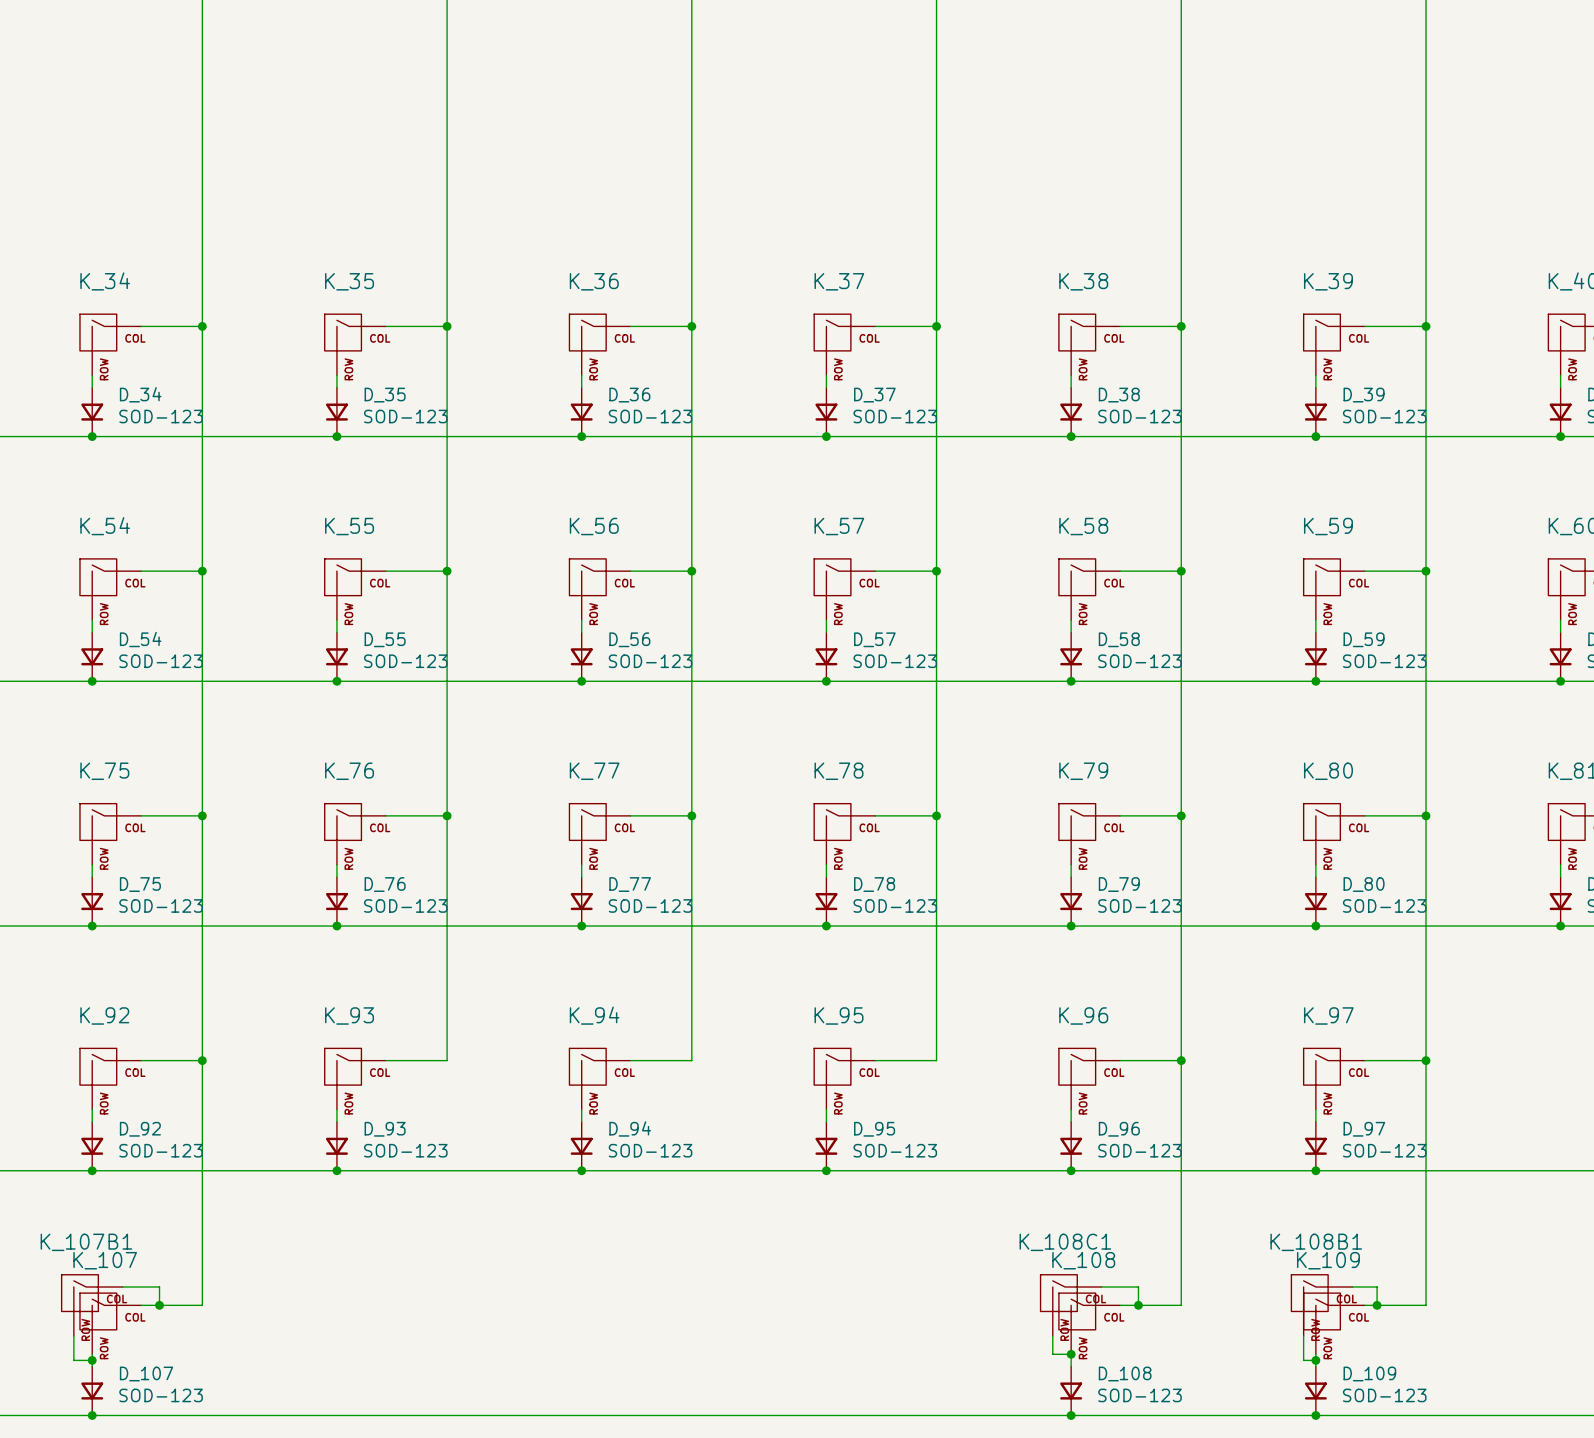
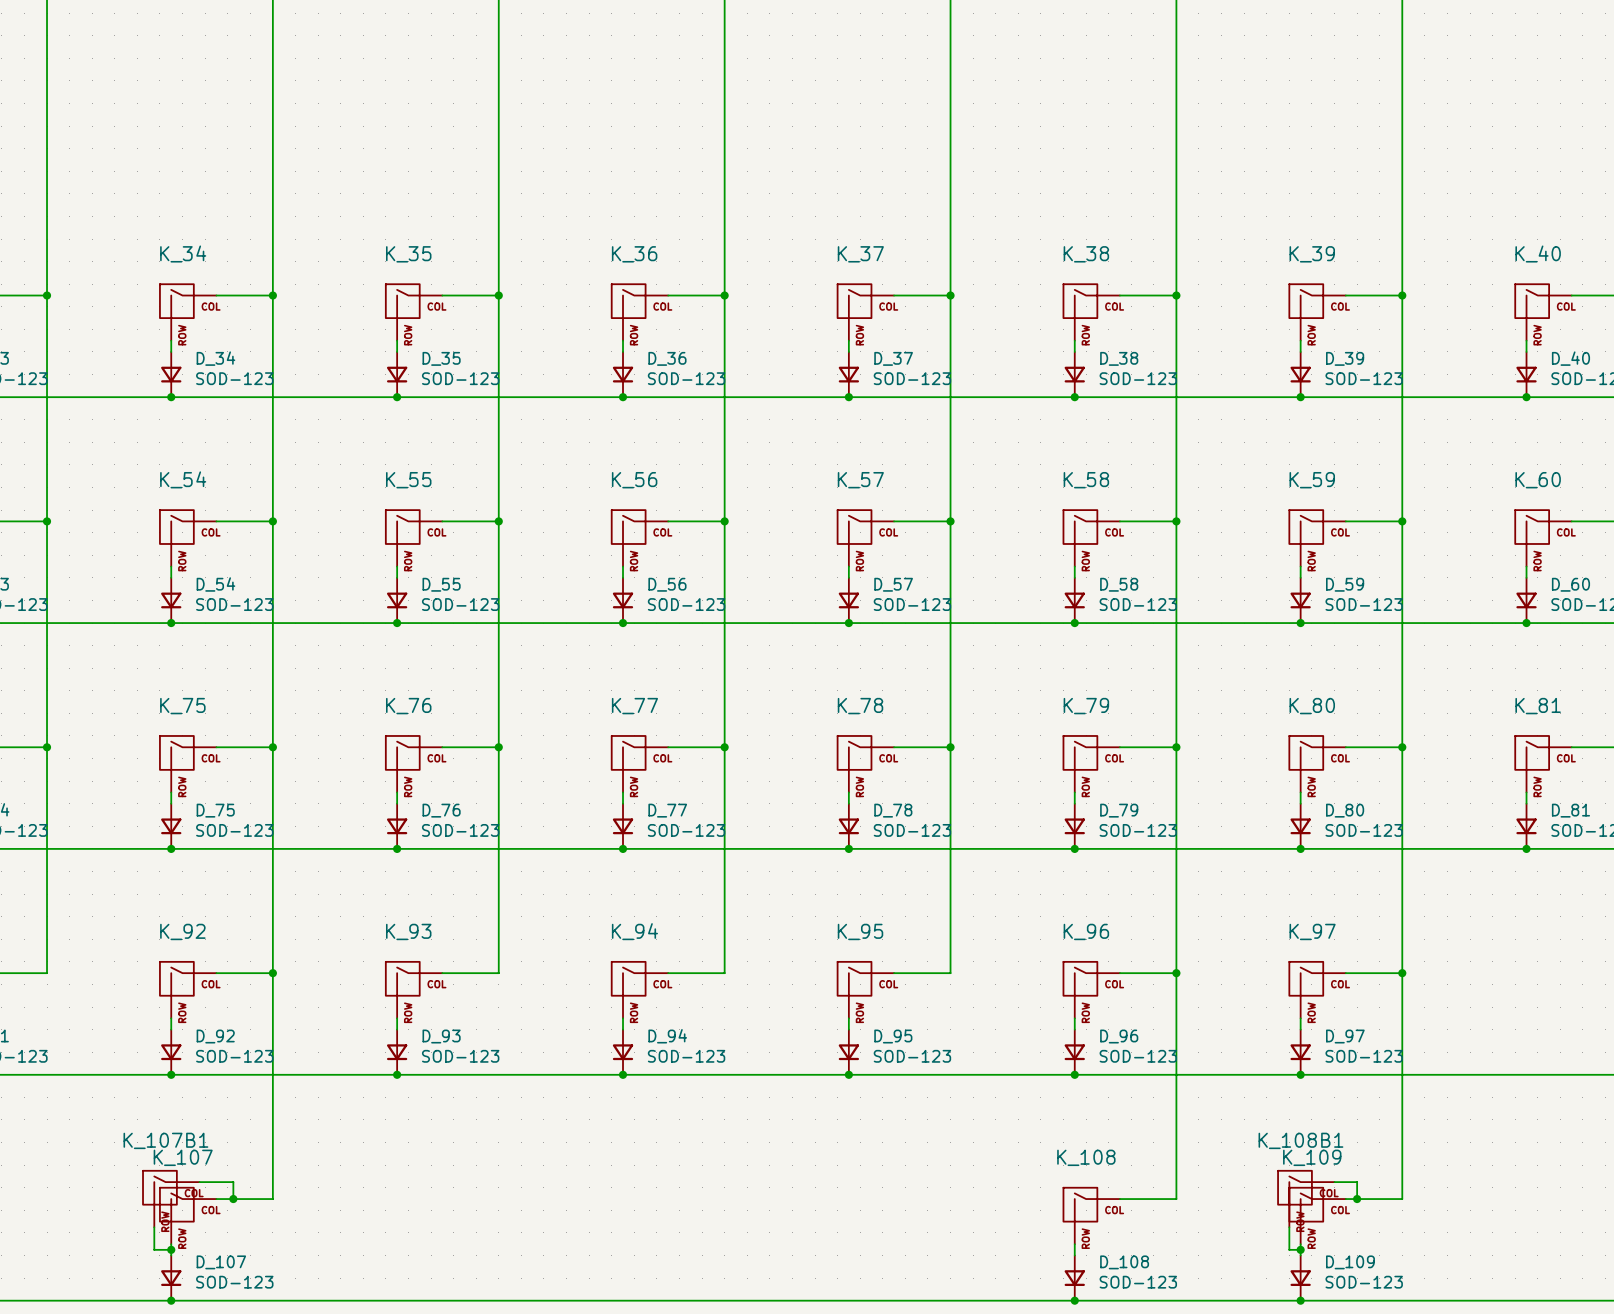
wire: (1101, 1286) (1138, 1286) (1138, 1305) -> none
K_108C1: (1071, 1305) -> none
junction: (1138, 1305) -> none
wire: (1052, 1335) (1052, 1354) (1071, 1354) -> none
junction: (1071, 1354) -> none

